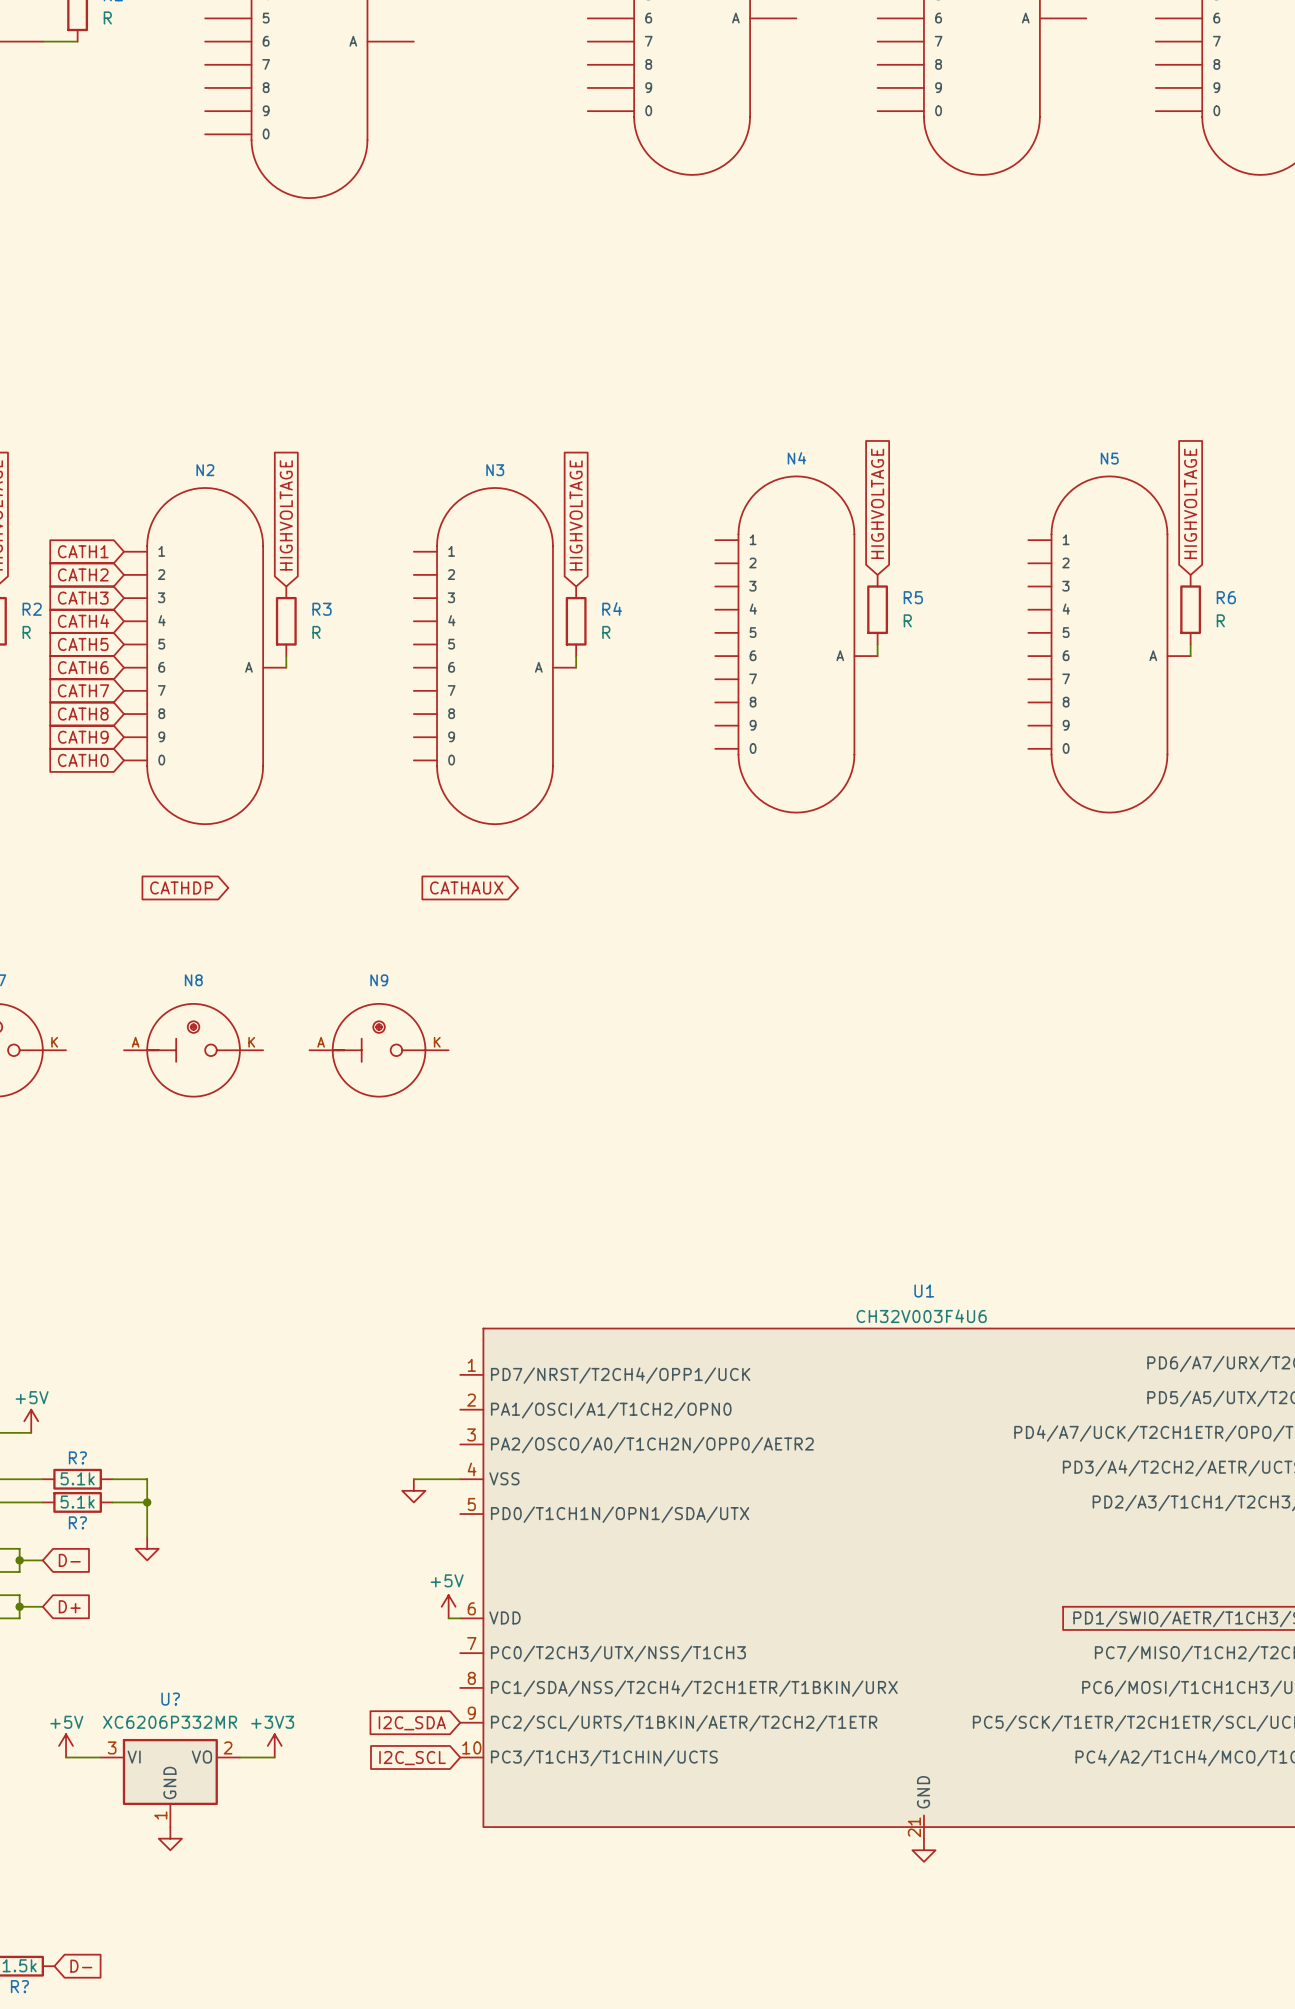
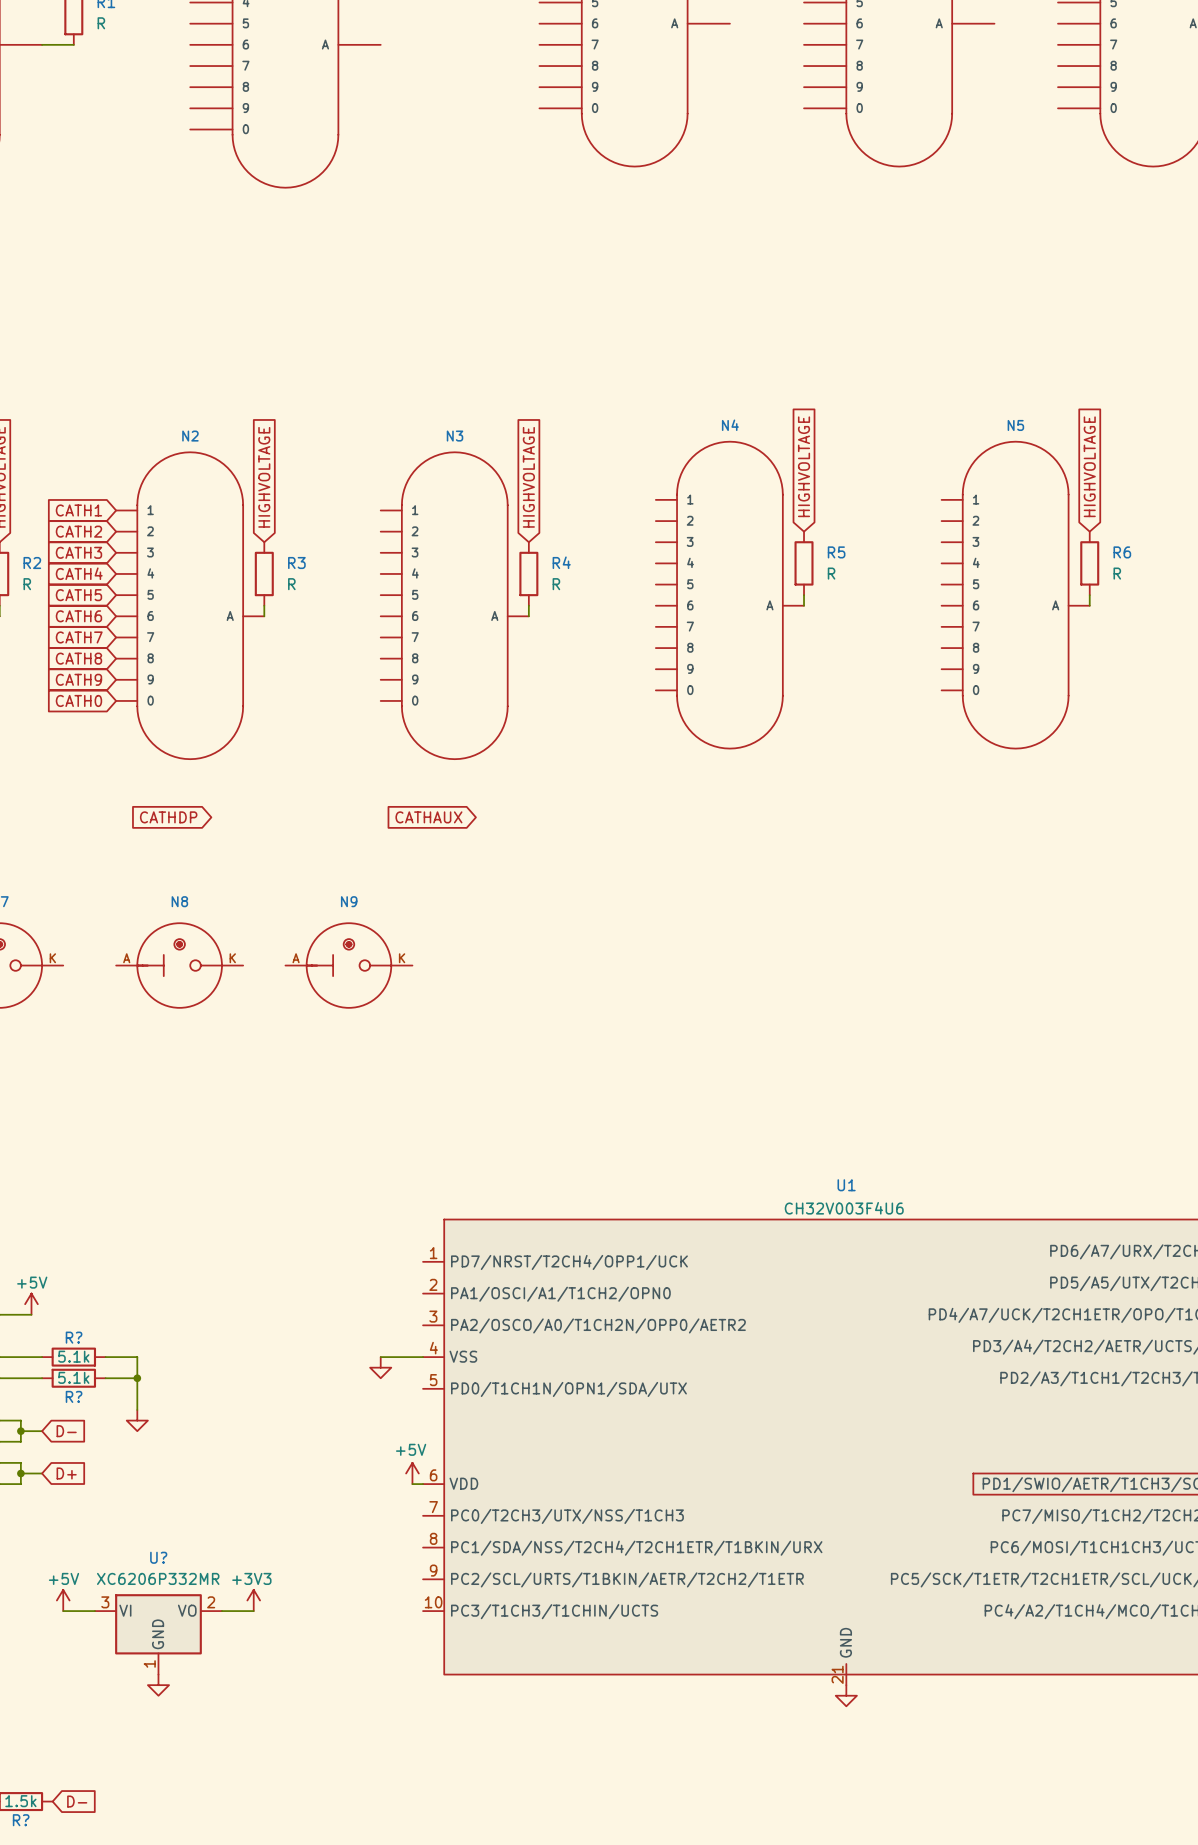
global label: I2C_SDA (412, 1723) -> none
global label: I2C_SCL (412, 1758) -> none

